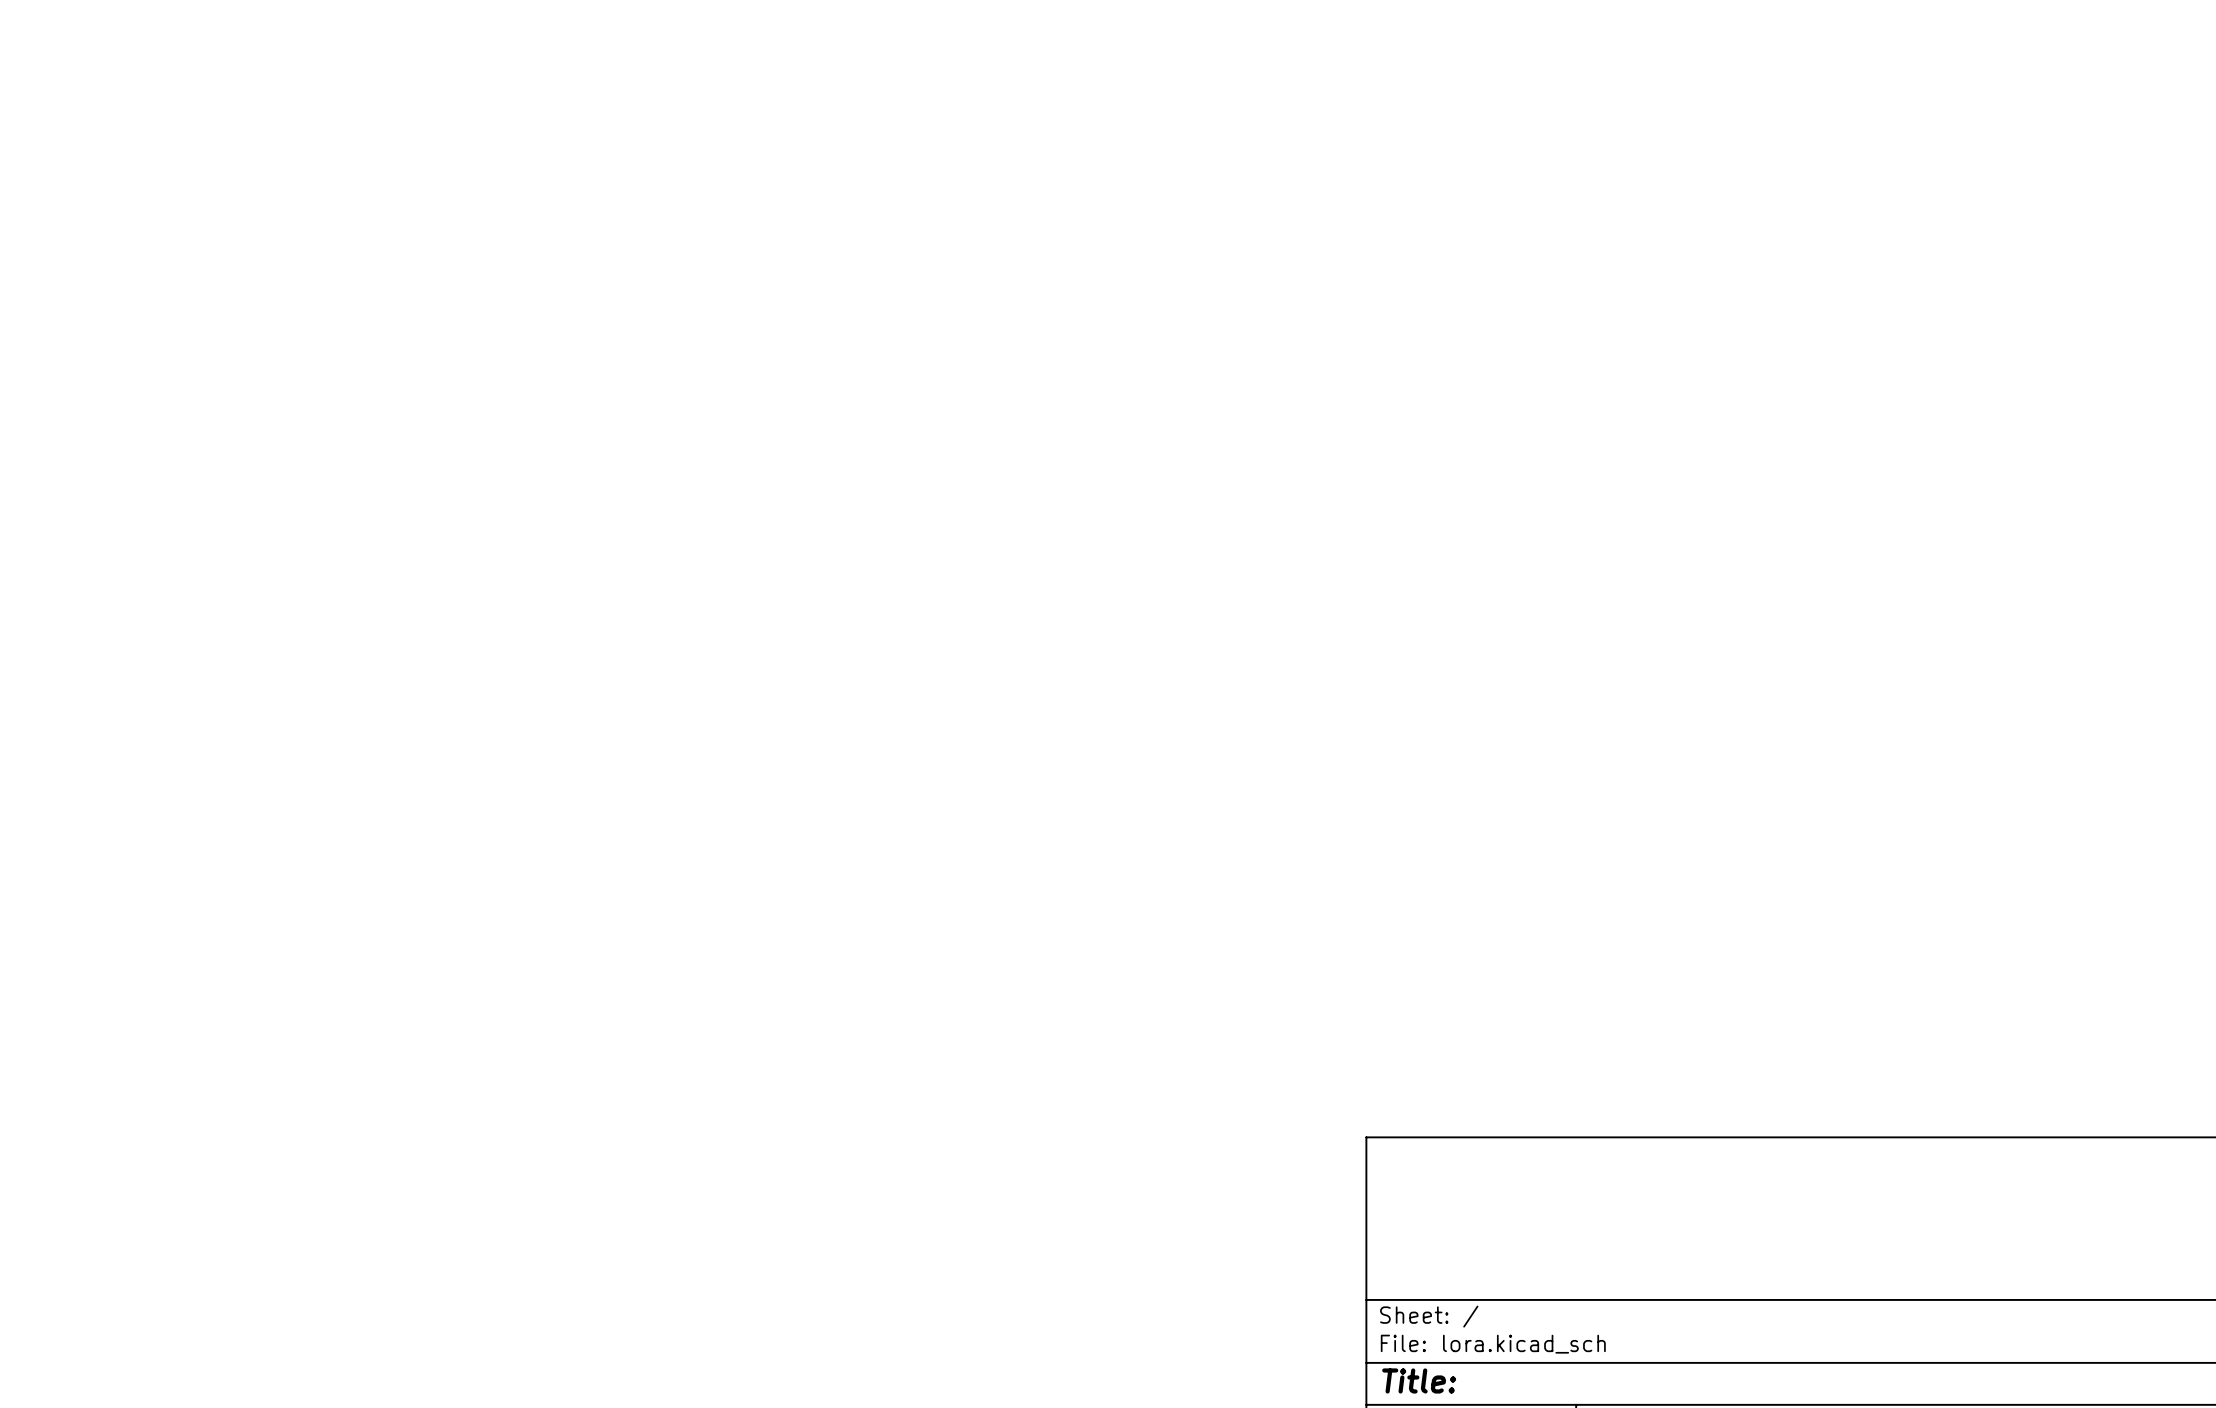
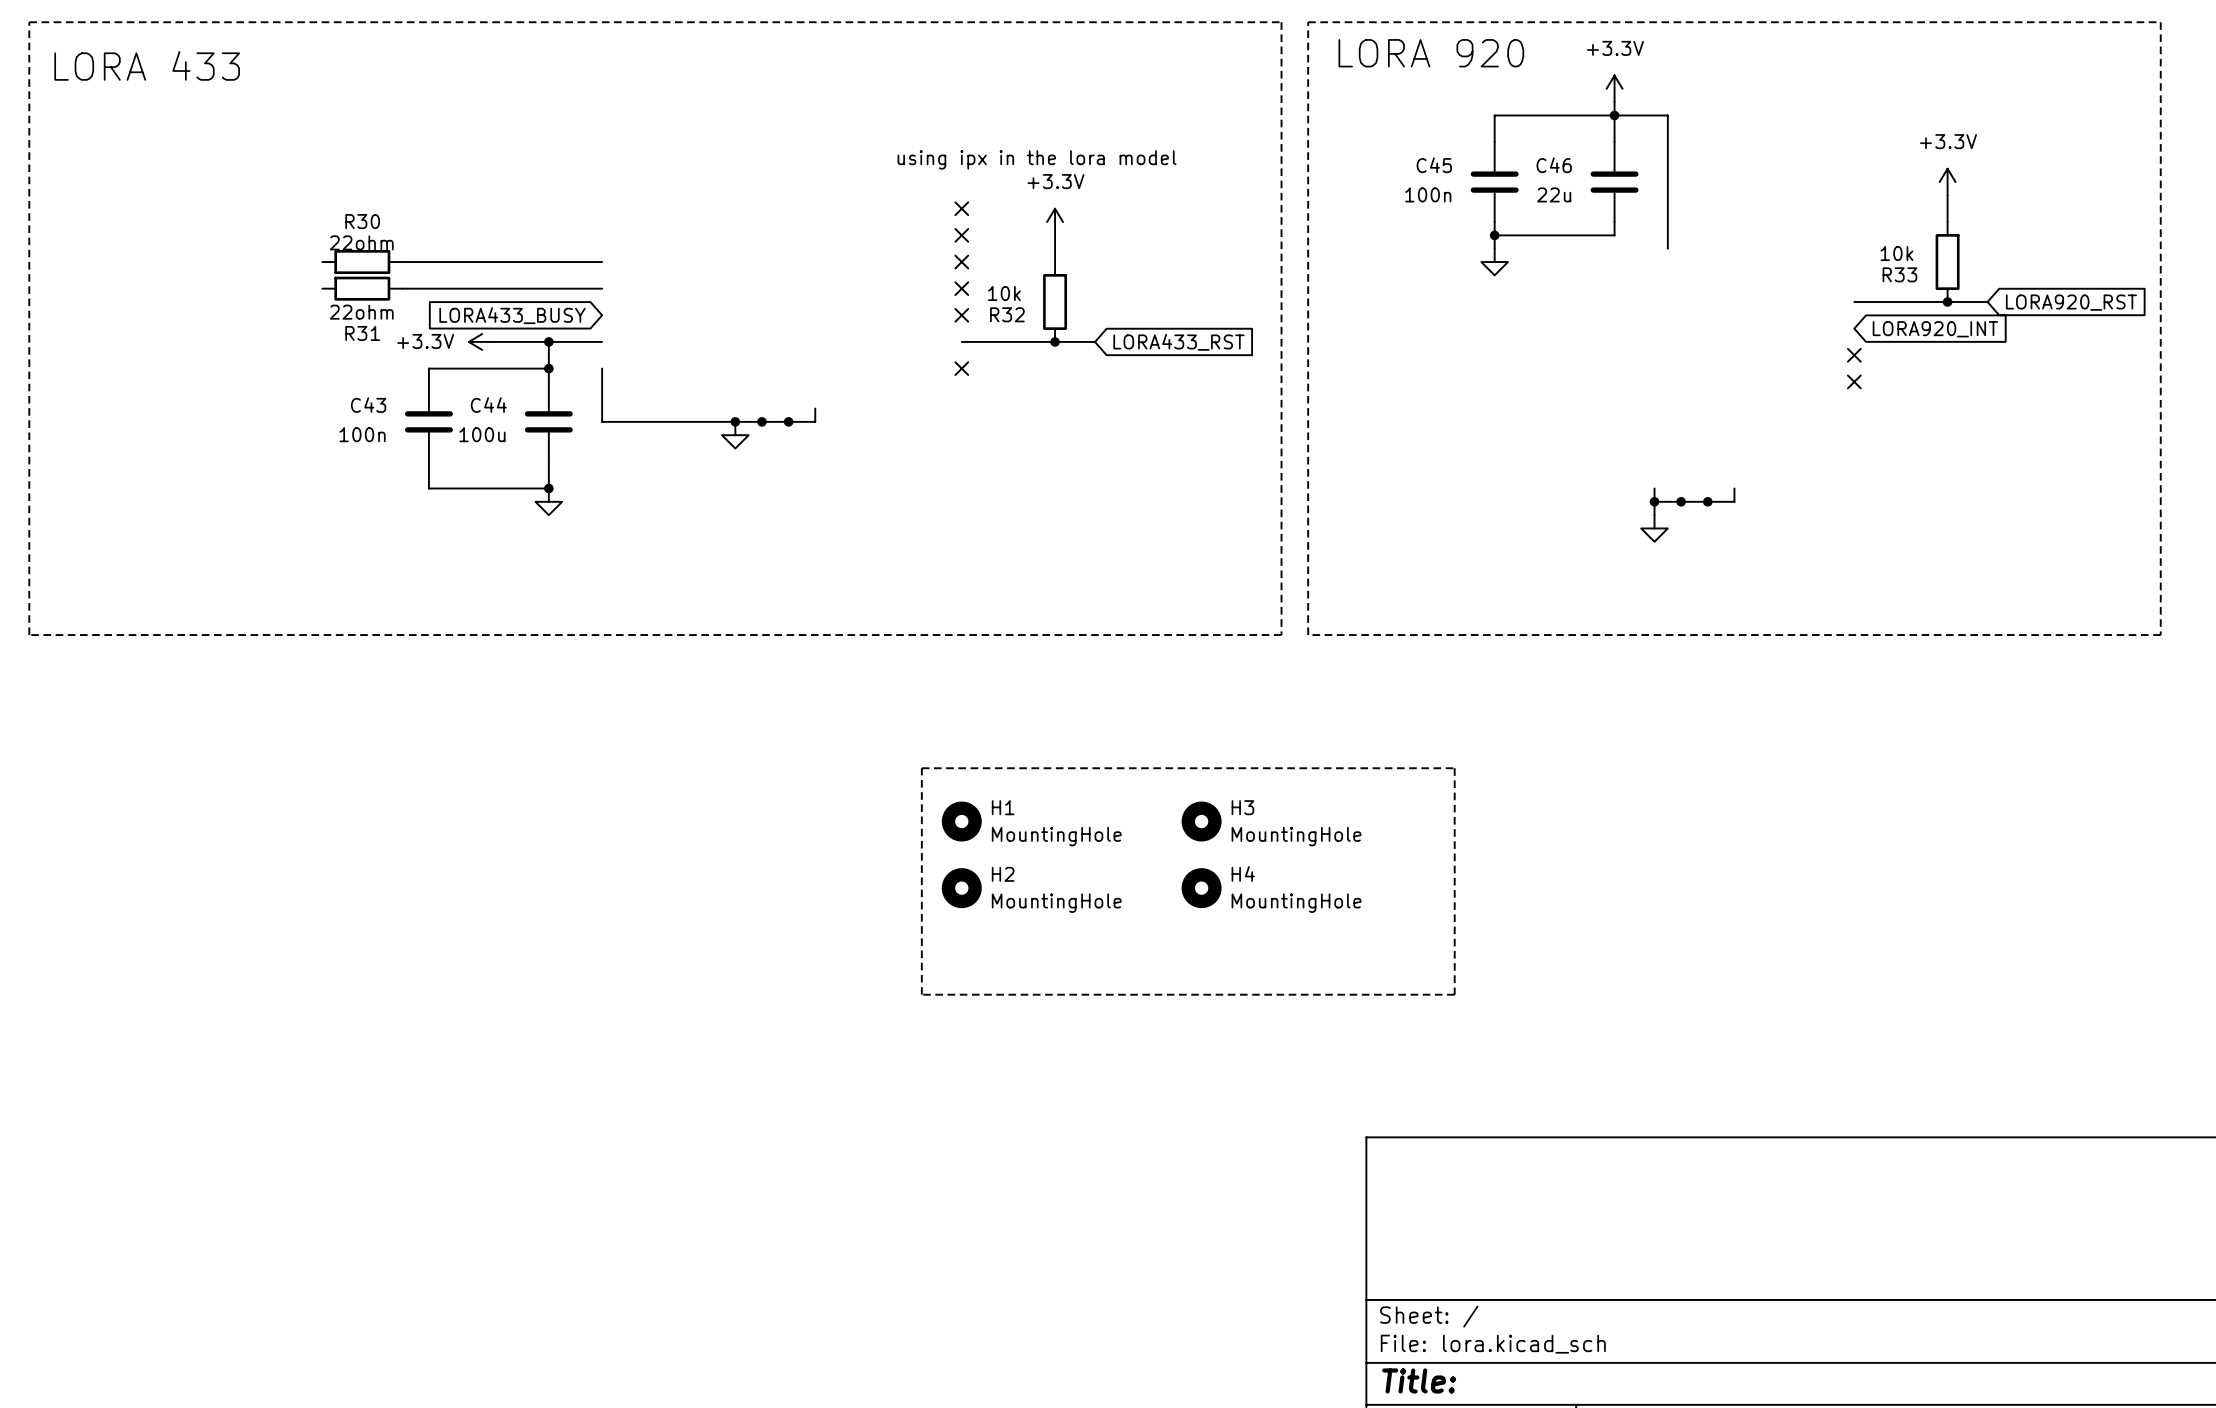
line: none -> (29, 22) (1281, 22) (1281, 635) (29, 635) (29, 22)
line: none -> (1308, 22) (2160, 22) (2160, 635) (1308, 635) (1308, 22)
text: none -> LORA 920 (1431, 53)
text: none -> LORA 433 (147, 65)
power symbol: none -> +3.3V (1614, 88)
wire: none -> (1614, 102) (1614, 142)
junction: none -> (1614, 115)
wire: none -> (1494, 142) (1494, 115) (1667, 115) (1667, 248)
text: none -> using ipx in the lora model (1037, 159)
C45: none -> 100n (1494, 182)
C46: none -> 22u (1614, 182)
power symbol: none -> +3.3V (1947, 182)
wire: none -> (1947, 195) (1947, 222)
no-connect mark: none -> (961, 208)
power symbol: none -> +3.3V (1055, 222)
wire: none -> (1494, 222) (1494, 248)
wire: none -> (1614, 222) (1614, 235) (1494, 235)
no-connect mark: none -> (961, 235)
wire: none -> (1055, 235) (1055, 262)
junction: none -> (1494, 235)
R30: none -> 22ohm (362, 262)
wire: none -> (402, 262) (602, 262)
no-connect mark: none -> (961, 262)
power symbol: none -> (1494, 262)
R33: none -> 10k (1947, 262)
R31: none -> 22ohm (362, 288)
wire: none -> (402, 288) (602, 288)
no-connect mark: none -> (961, 288)
R32: none -> 10k (1055, 301)
wire: none -> (1854, 301) (1987, 301)
junction: none -> (1947, 301)
global label: none -> LORA920_RST (2071, 302)
global label: none -> LORA433_BUSY (512, 315)
no-connect mark: none -> (961, 315)
global label: none -> LORA920_INT (1935, 329)
power symbol: none -> +3.3V (482, 341)
wire: none -> (495, 341) (602, 341)
wire: none -> (548, 341) (548, 381)
junction: none -> (548, 341)
wire: none -> (961, 341) (1095, 341)
junction: none -> (1055, 341)
global label: none -> LORA433_RST (1178, 342)
no-connect mark: none -> (1854, 355)
wire: none -> (548, 368) (428, 368) (428, 381)
junction: none -> (548, 368)
wire: none -> (602, 368) (602, 421) (815, 421) (815, 408)
no-connect mark: none -> (961, 368)
no-connect mark: none -> (1854, 381)
C43: none -> 100n (428, 421)
C44: none -> 100u (548, 421)
junction: none -> (735, 421)
junction: none -> (761, 421)
junction: none -> (788, 421)
power symbol: none -> (735, 435)
wire: none -> (428, 461) (428, 488) (548, 488) (548, 461)
junction: none -> (548, 488)
wire: none -> (1654, 488) (1654, 515)
wire: none -> (1734, 488) (1734, 501) (1654, 501)
power symbol: none -> (548, 501)
junction: none -> (1654, 501)
junction: none -> (1681, 501)
junction: none -> (1707, 501)
power symbol: none -> (1654, 528)
line: none -> (921, 768) (1454, 768) (1454, 994) (921, 994) (921, 768)
H1: none -> MountingHole (961, 821)
H3: none -> MountingHole (1201, 821)
H2: none -> MountingHole (961, 888)
H4: none -> MountingHole (1201, 888)

